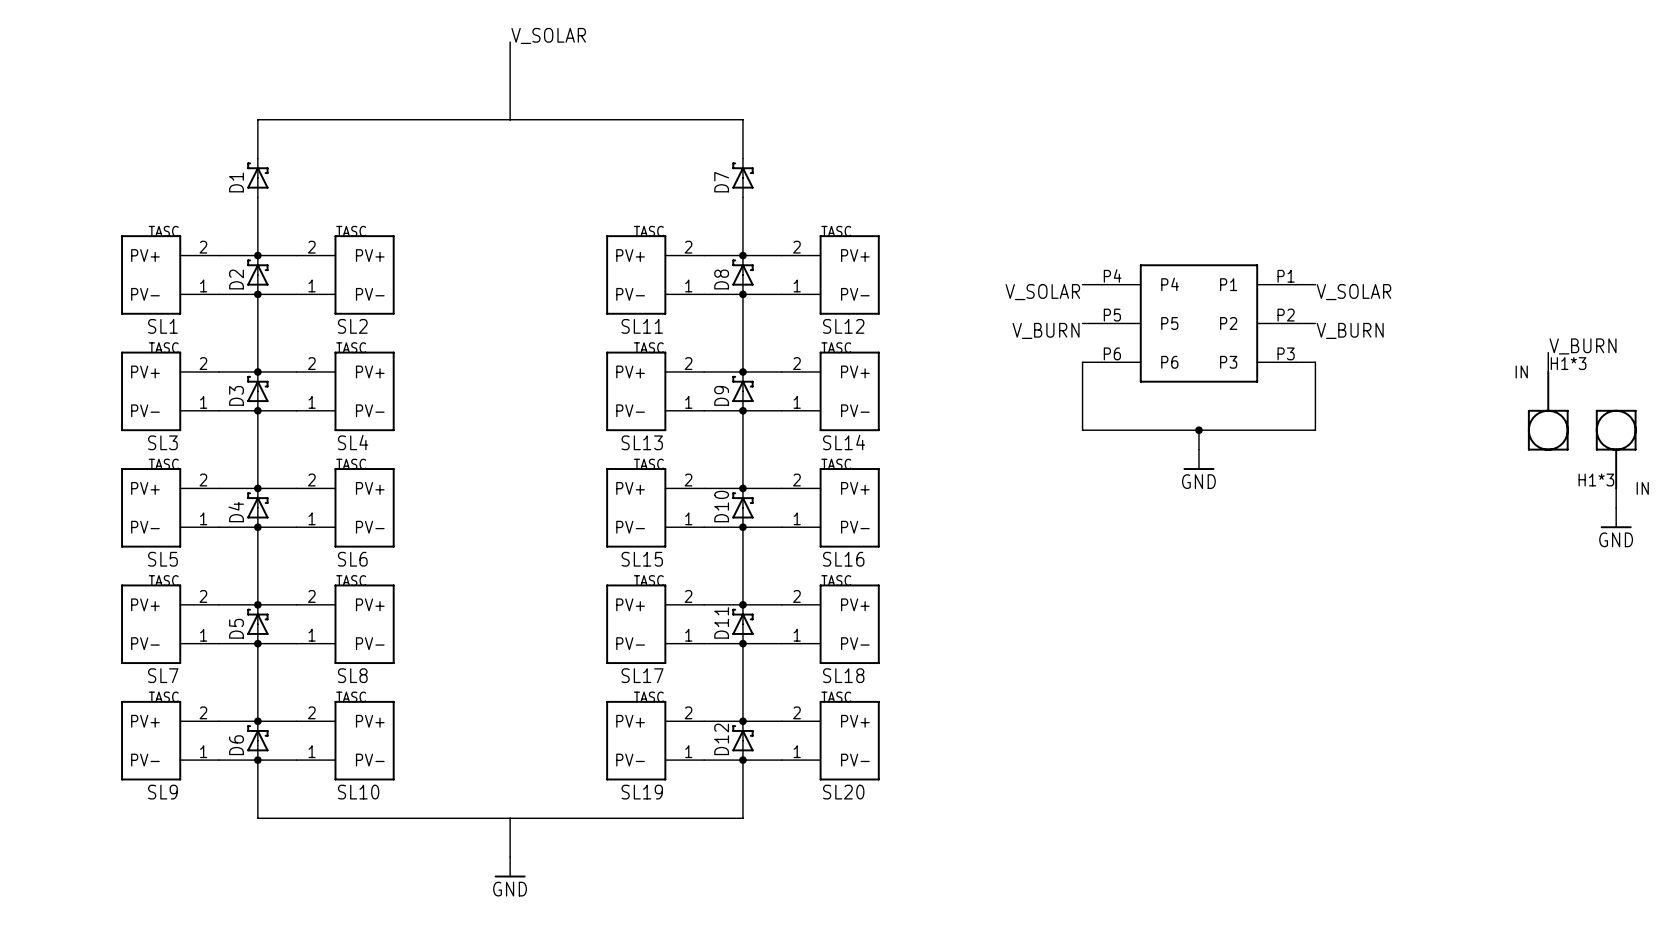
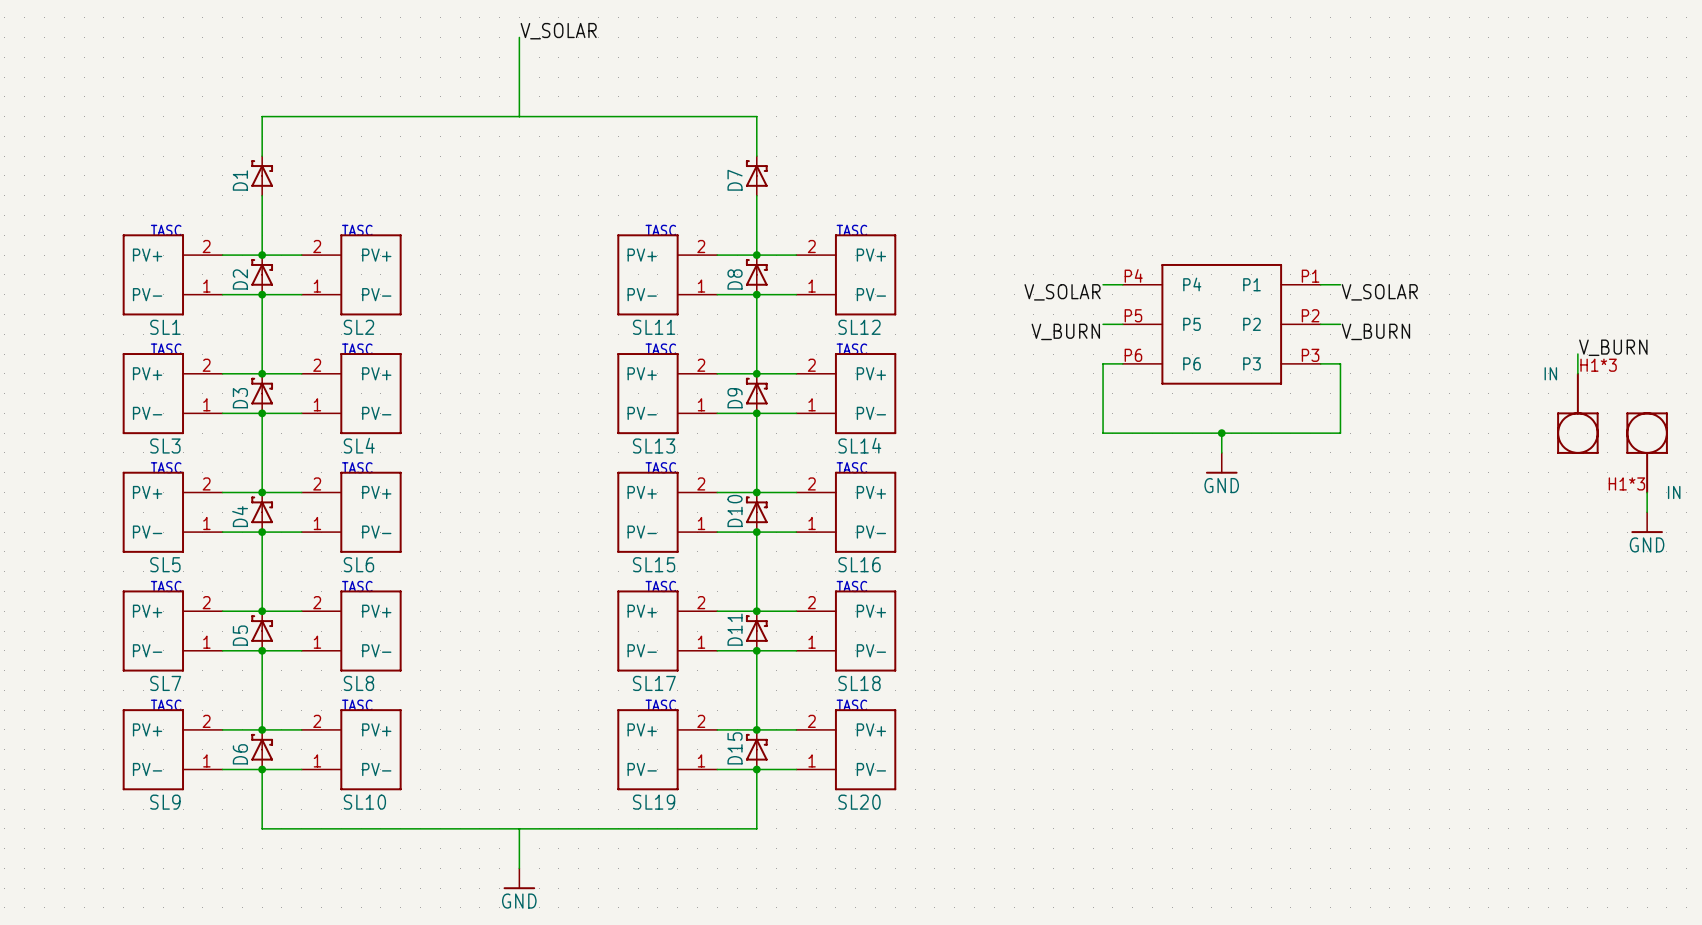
D12 name: D12 (721, 739) -> D15 (735, 748)

